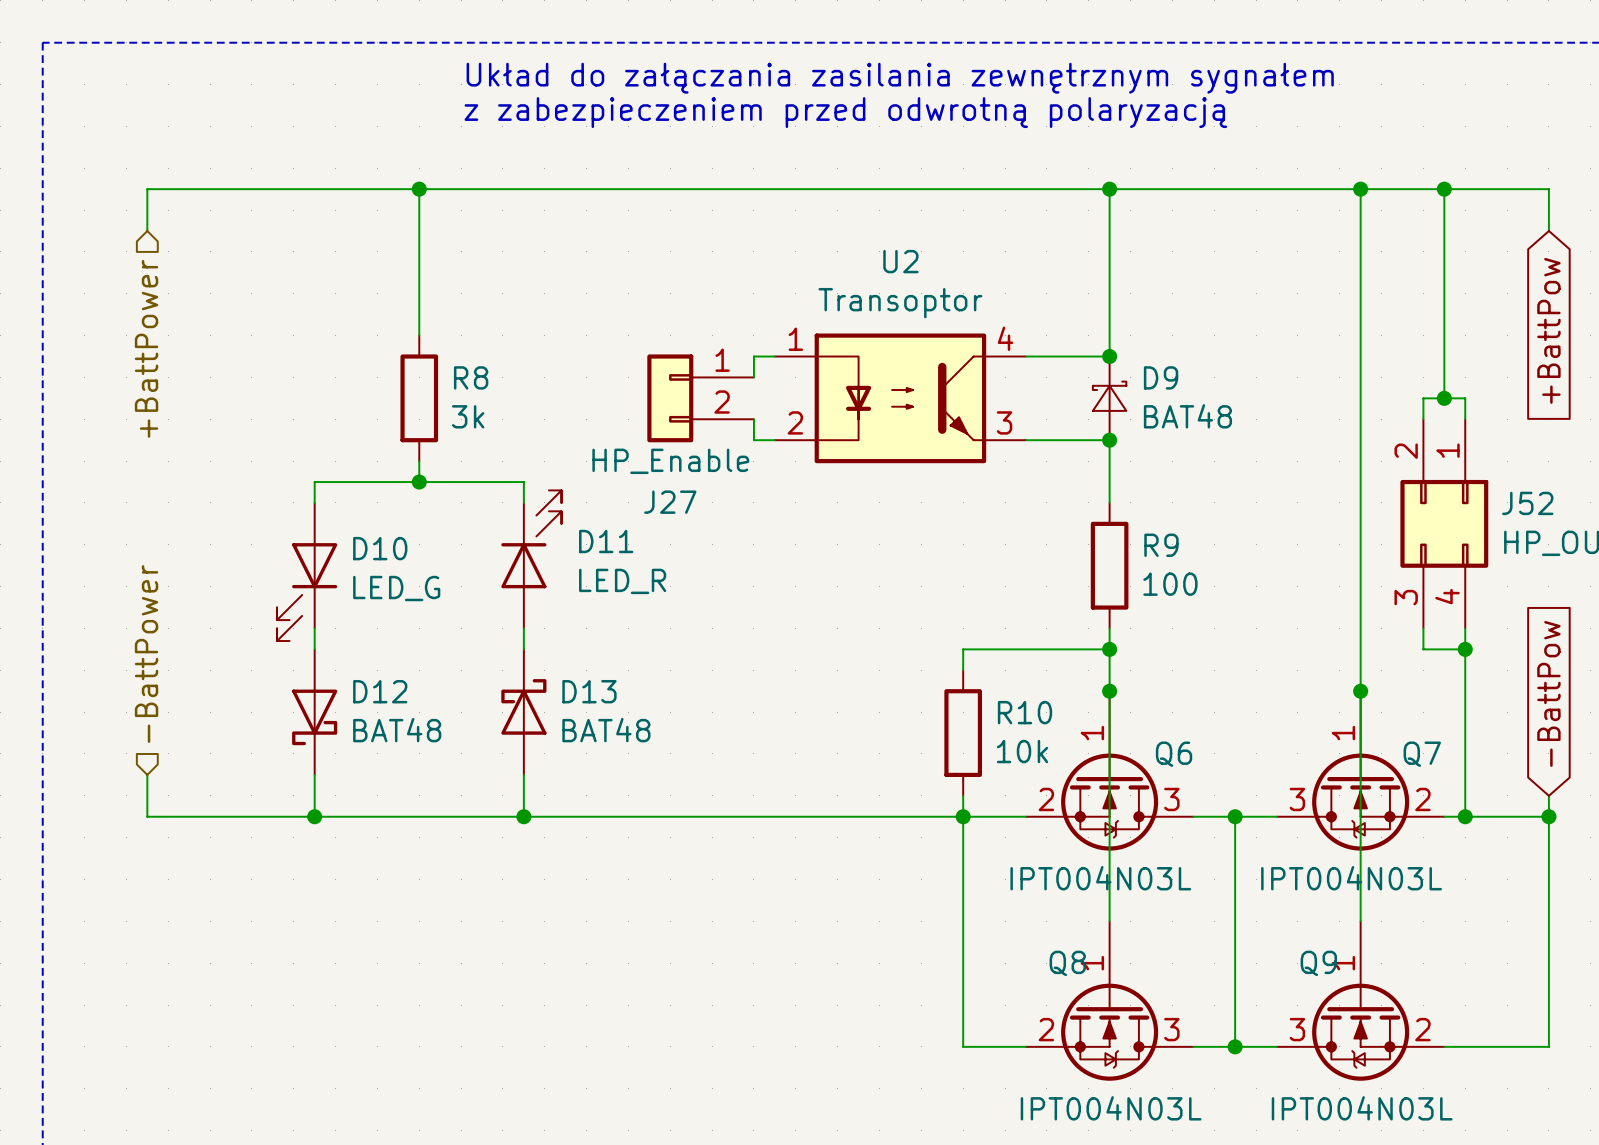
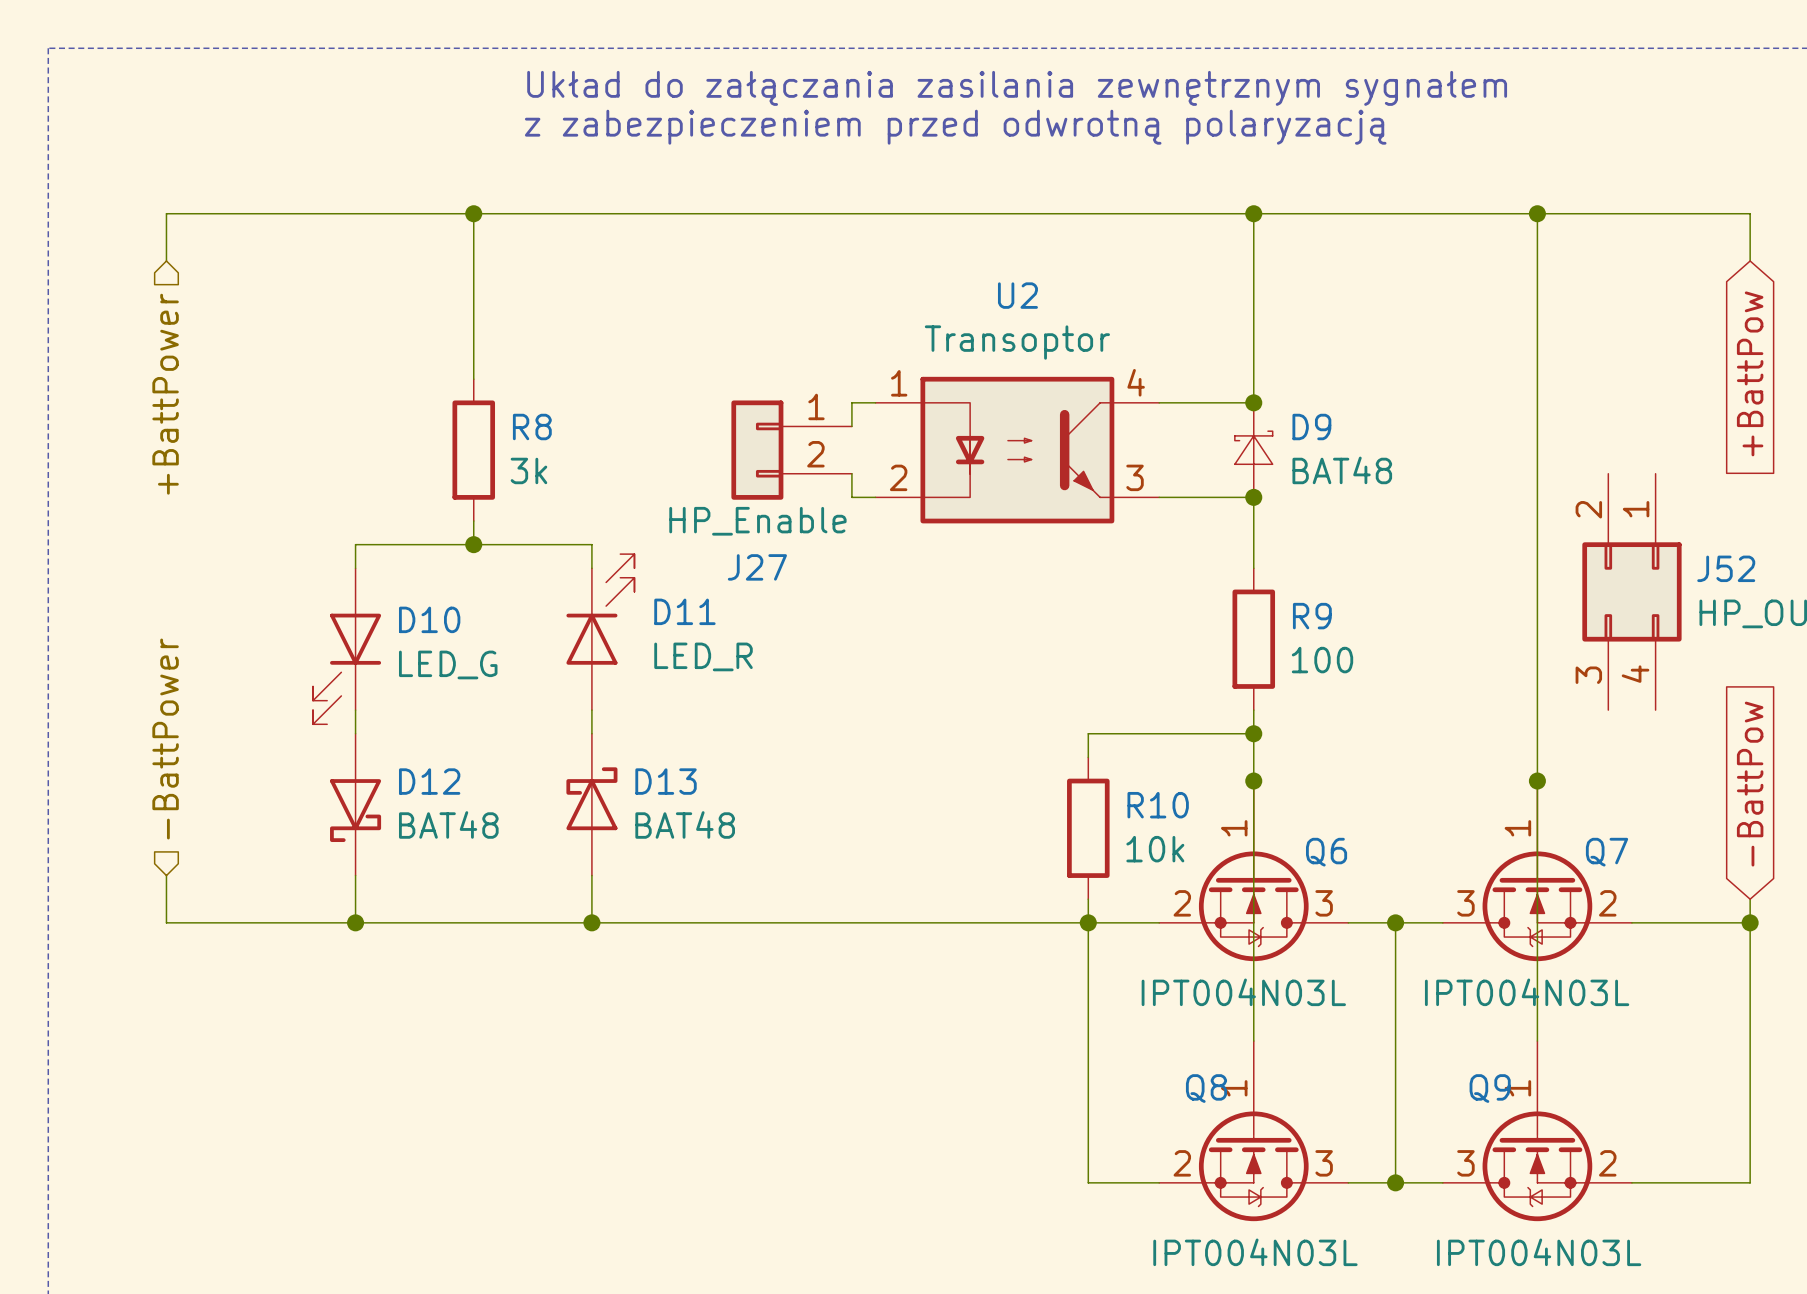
wire: (1444, 189) (1444, 398) -> none
junction: (1444, 189) -> none
junction: (1444, 398) -> none
wire: (1423, 419) (1423, 398) (1465, 398) (1465, 419) -> none
wire: (1423, 628) (1423, 649) (1465, 649) -> none
wire: (1465, 628) (1465, 816) -> none
junction: (1465, 649) -> none
junction: (1465, 816) -> none

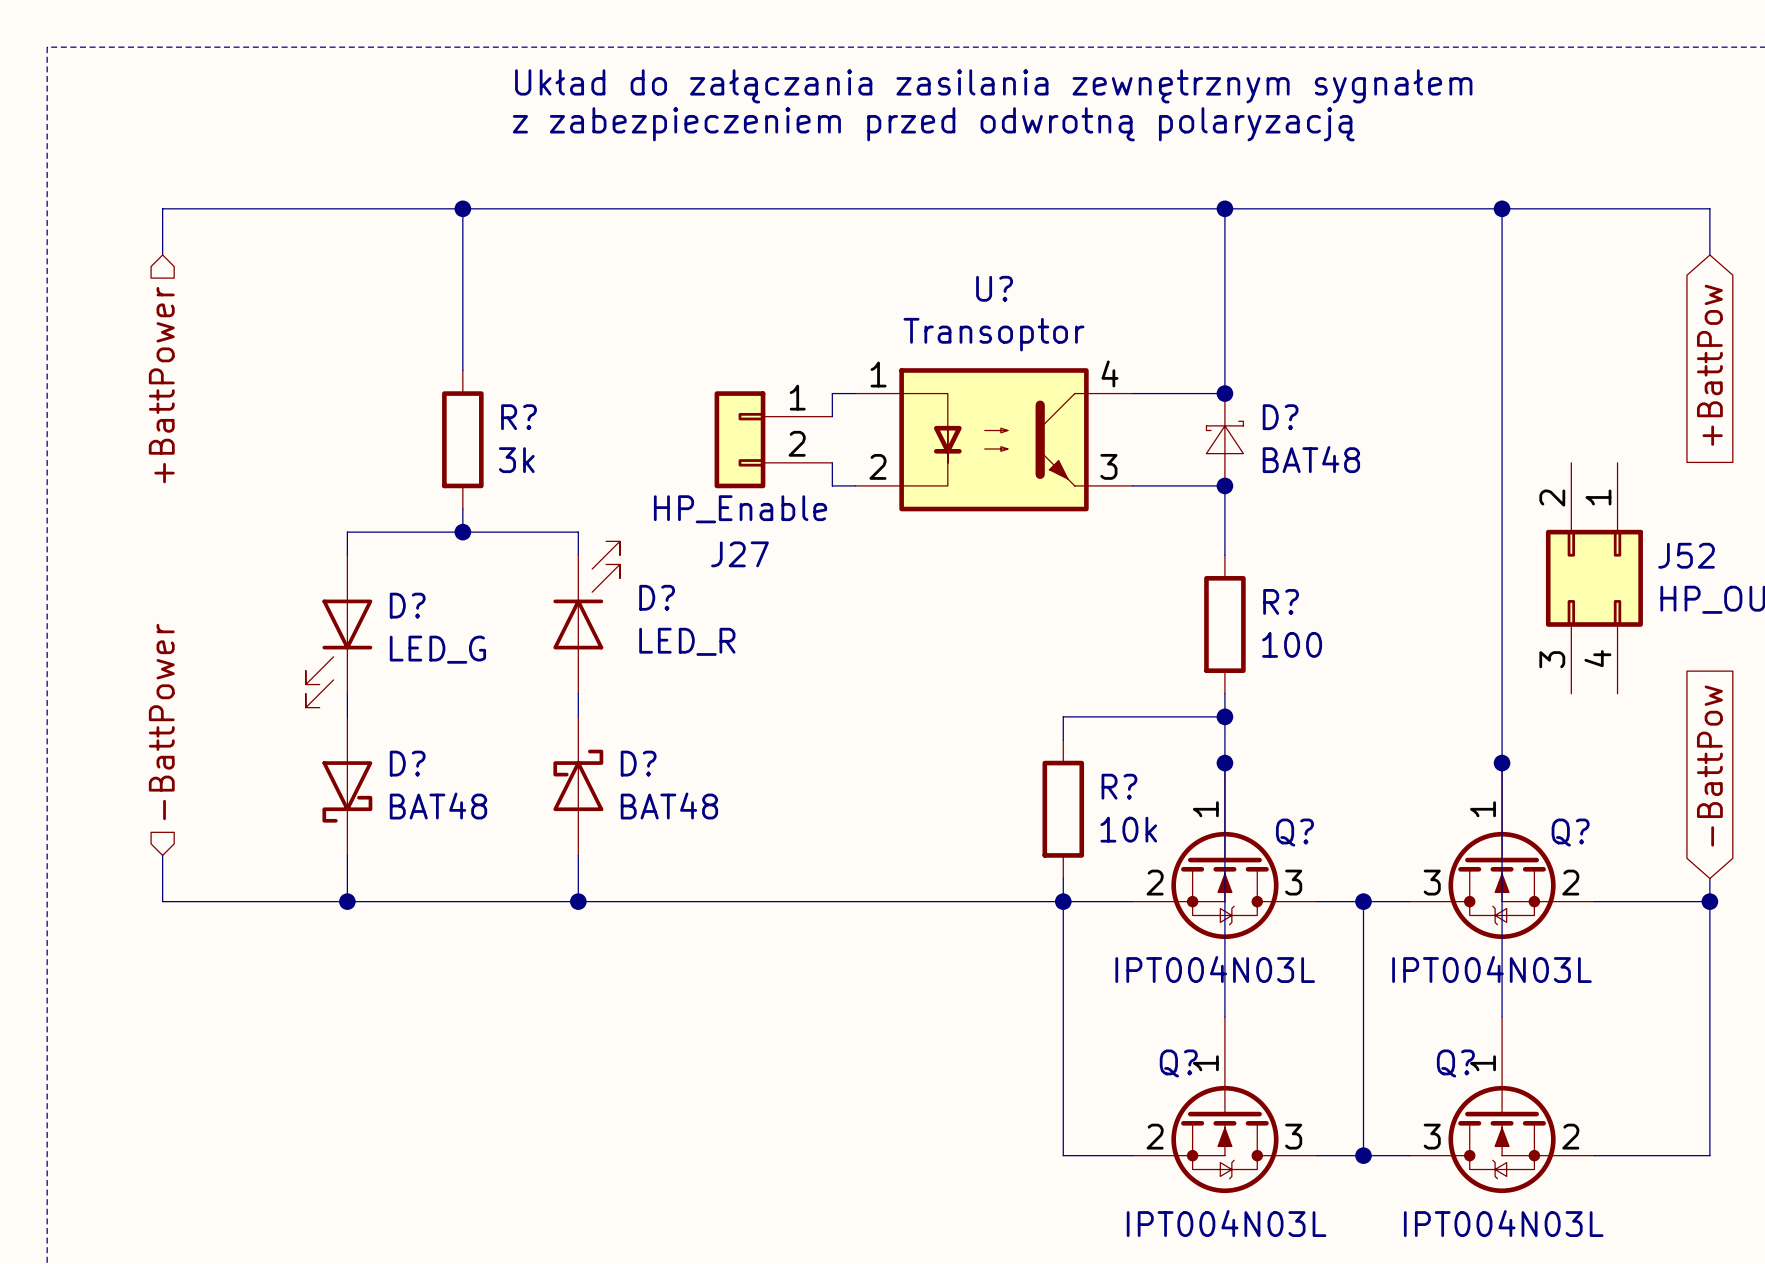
U2 name: U2 (1017, 295) -> U? (994, 288)
R8 name: R8 (532, 427) -> R? (519, 417)
D9 name: D9 (1311, 427) -> D? (1280, 417)
D11 name: D11 (684, 611) -> D? (657, 597)
R9 name: R9 (1312, 616) -> R? (1281, 601)
D10 name: D10 (429, 619) -> D? (407, 605)
D12 name: D12 (429, 781) -> D? (407, 763)
D13 name: D13 (666, 781) -> D? (638, 763)
R10 name: R10 (1158, 805) -> R? (1119, 786)
Q6 name: Q6 (1326, 852) -> Q? (1294, 832)
Q7 name: Q7 (1607, 852) -> Q? (1570, 832)
Q8 name: Q8 (1206, 1088) -> Q? (1178, 1063)
Q9 name: Q9 (1490, 1088) -> Q? (1455, 1063)

